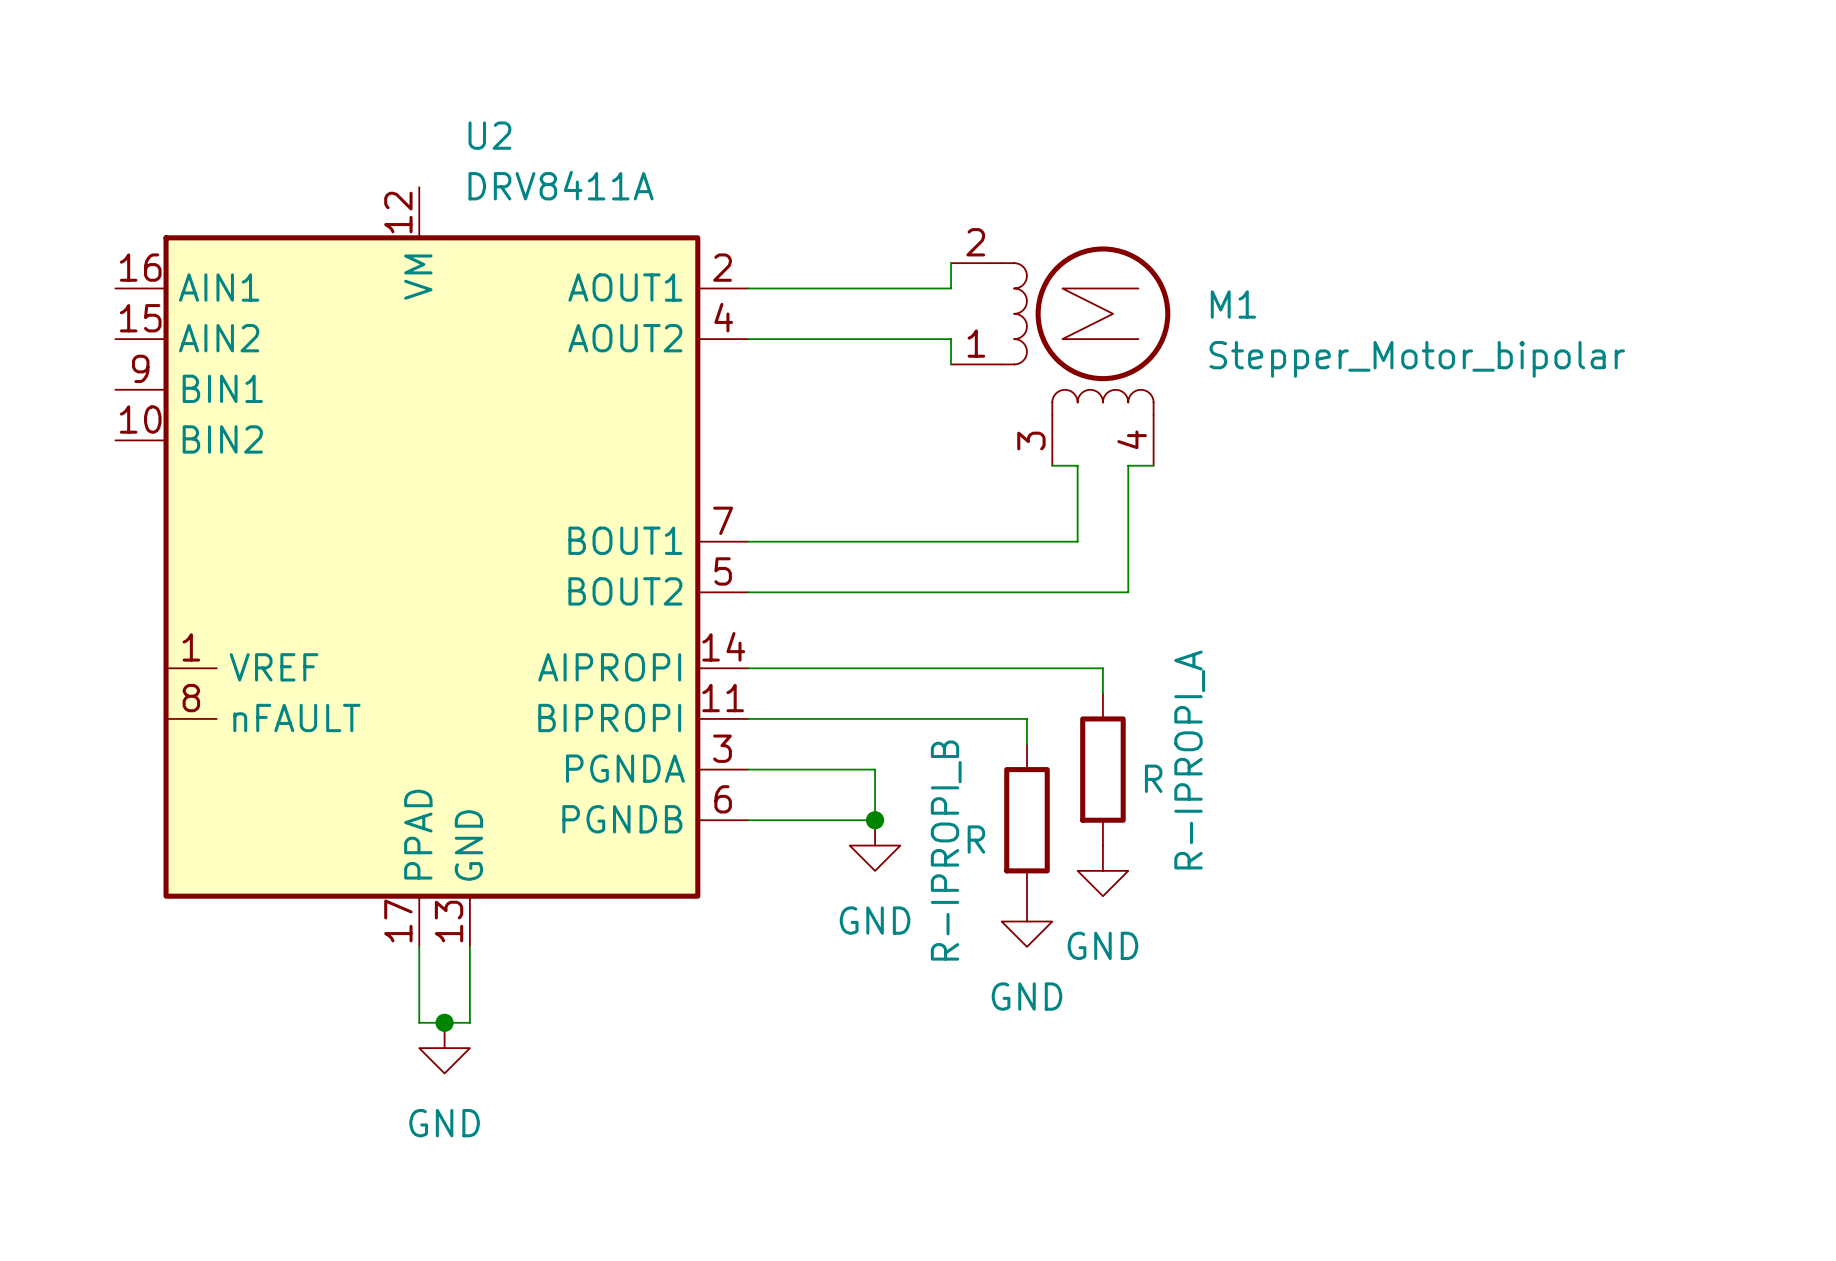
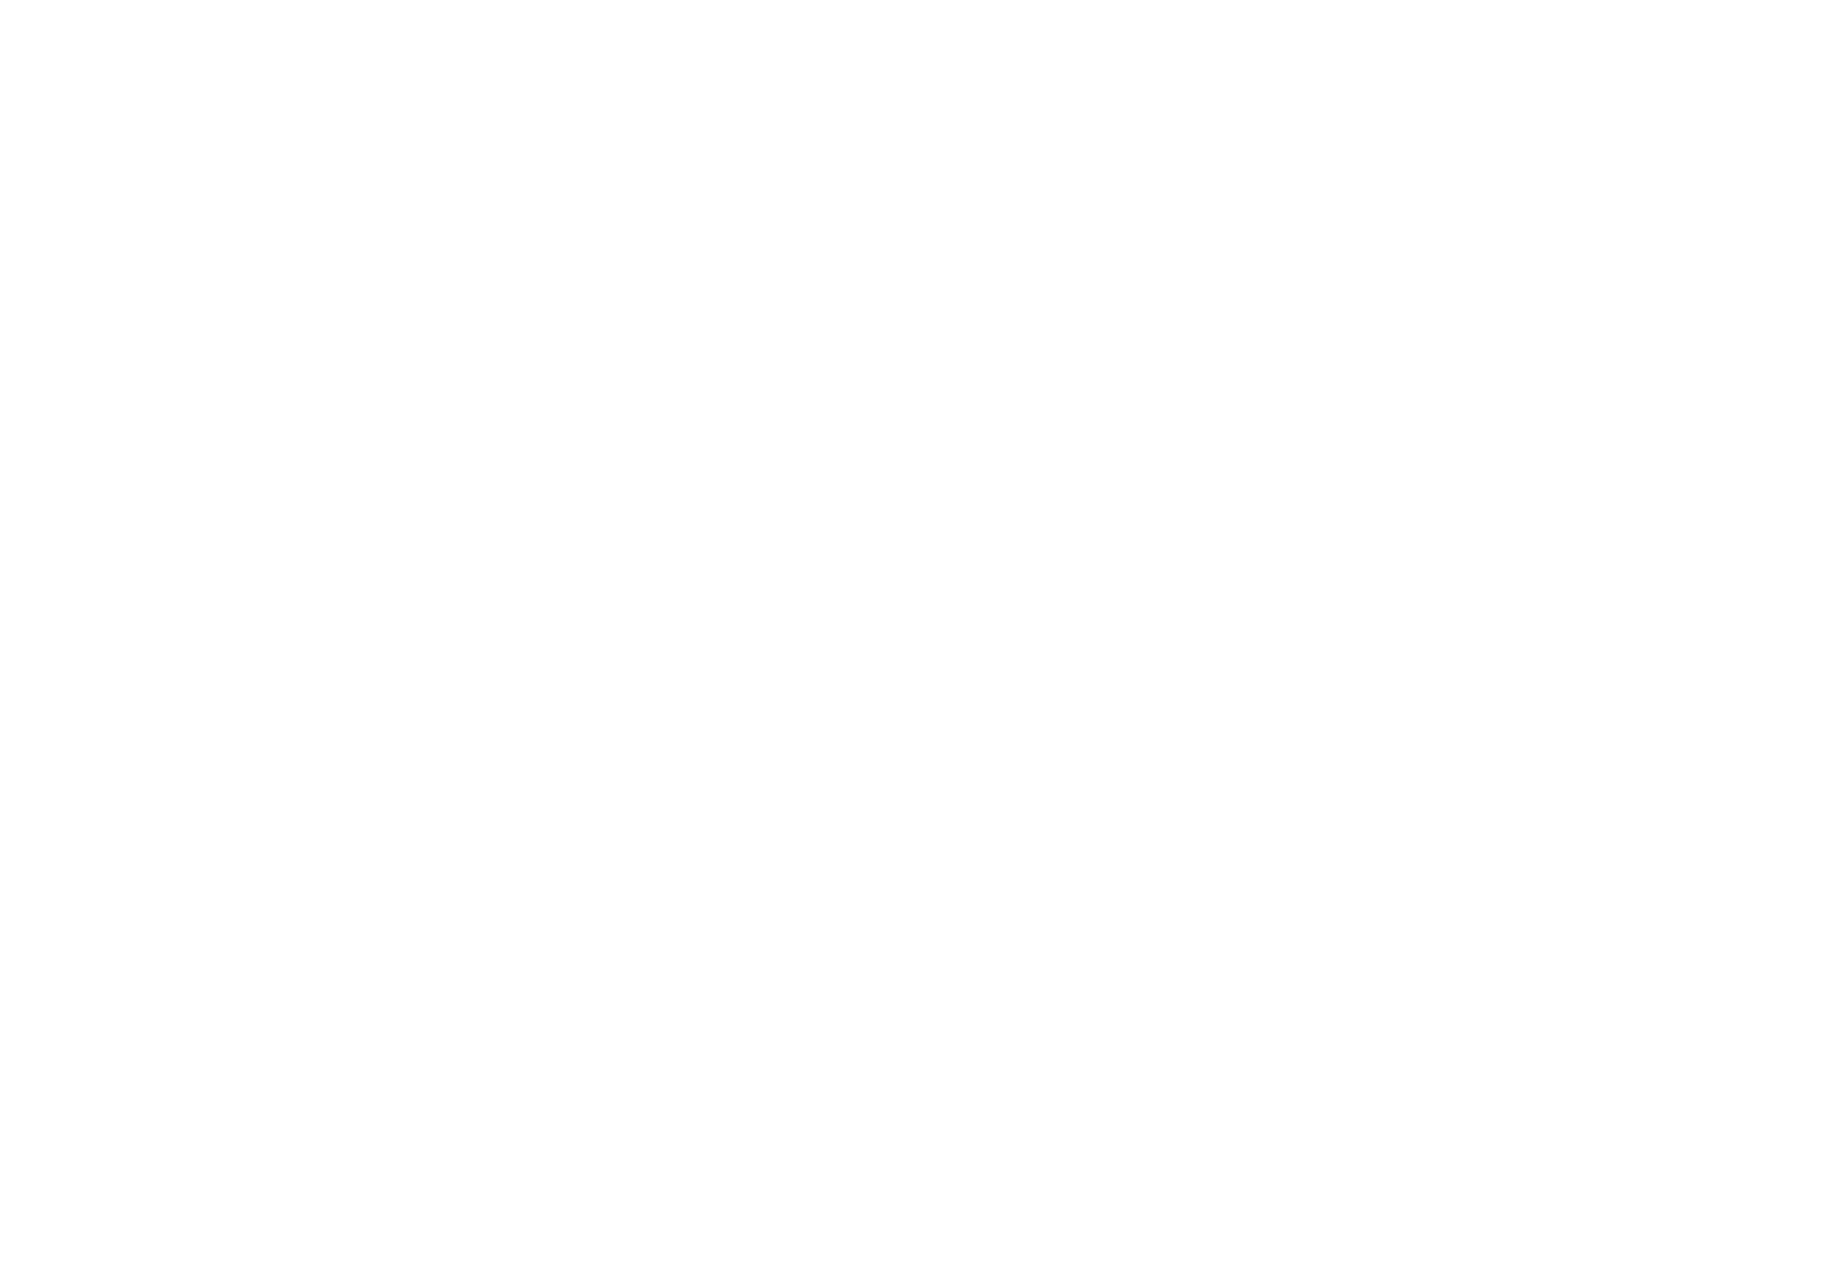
wire: (951, 263) (951, 288) (748, 288) -> none
wire: (748, 339) (951, 339) (951, 364) -> none
M1: Stepper_Motor_bipolar (1060, 356) -> none
wire: (1052, 465) (1077, 465) (1077, 541) (748, 541) -> none
wire: (1153, 465) (1128, 465) (1128, 592) (748, 592) -> none
U2: DRV8411A (431, 567) -> none
wire: (748, 668) (1102, 668) (1102, 693) -> none
wire: (748, 718) (1026, 718) (1026, 744) -> none
wire: (748, 769) (875, 769) (875, 820) (748, 820) -> none
R-IPROPI_A: R (1102, 769) -> none
junction: (875, 820) -> none
R-IPROPI_B: R (1026, 820) -> none
power symbol: GND (875, 845) -> none
power symbol: GND (1102, 870) -> none
power symbol: GND (1026, 921) -> none
wire: (419, 946) (419, 1022) (469, 1022) (469, 946) -> none
junction: (444, 1022) -> none
power symbol: GND (444, 1048) -> none

